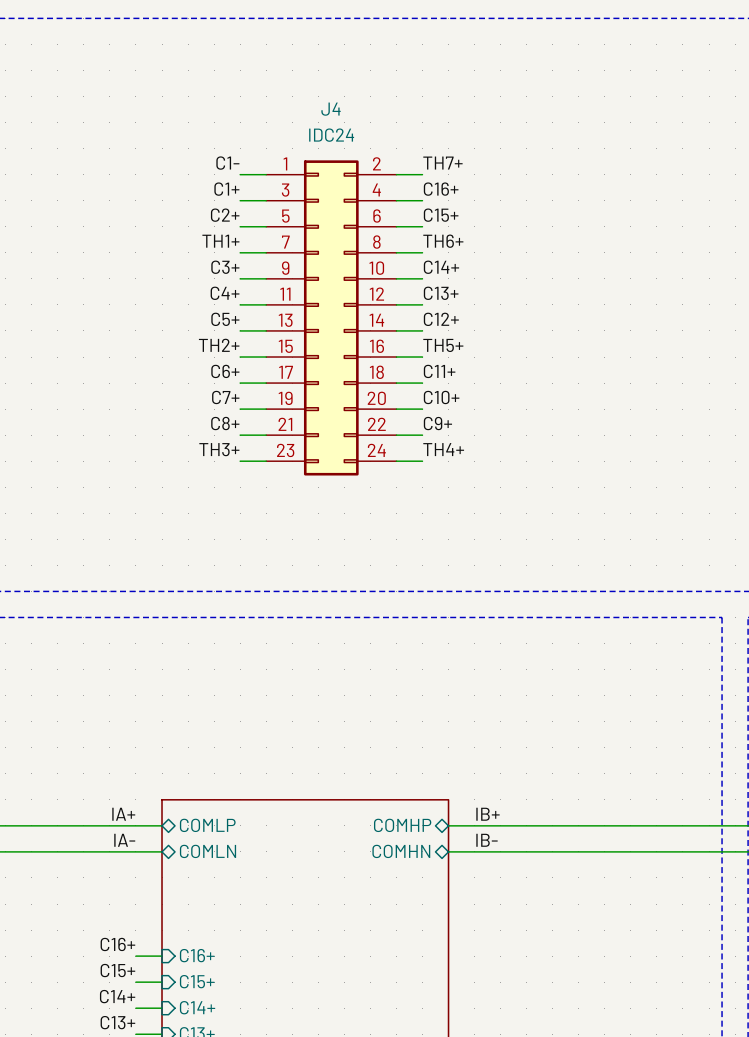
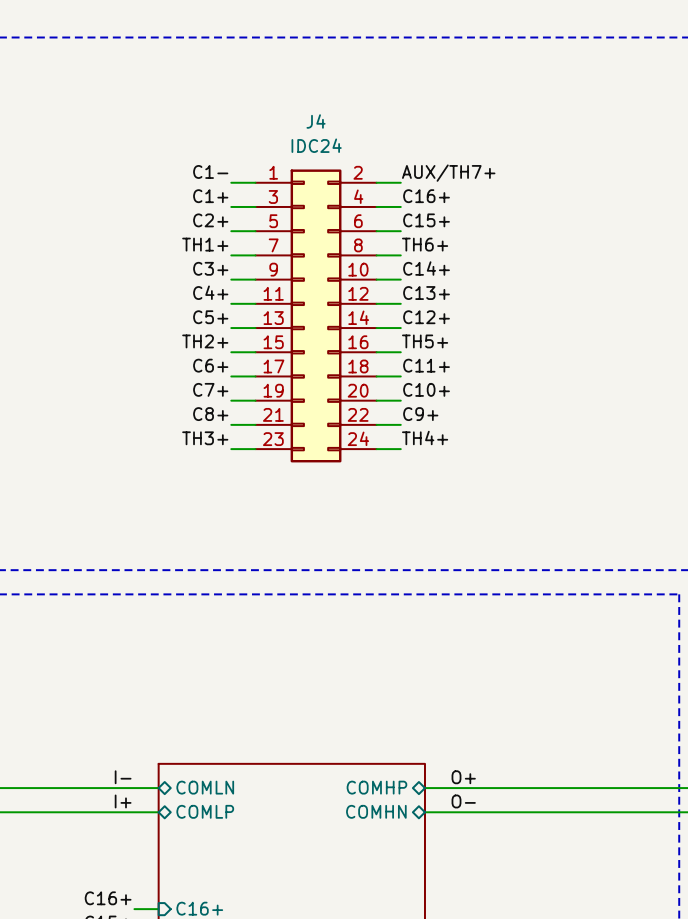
label: TH7+ (442, 163) -> AUX/TH7+ (448, 173)
label: IA+ (123, 814) -> I- (123, 777)
label: IB+ (487, 814) -> O+ (463, 777)
sheet pin: COMLP (207, 825) -> COMLN (205, 787)
label: IA- (124, 840) -> I+ (123, 801)
label: IB- (487, 840) -> O- (463, 801)
sheet pin: COMLN (208, 851) -> COMLP (205, 811)

